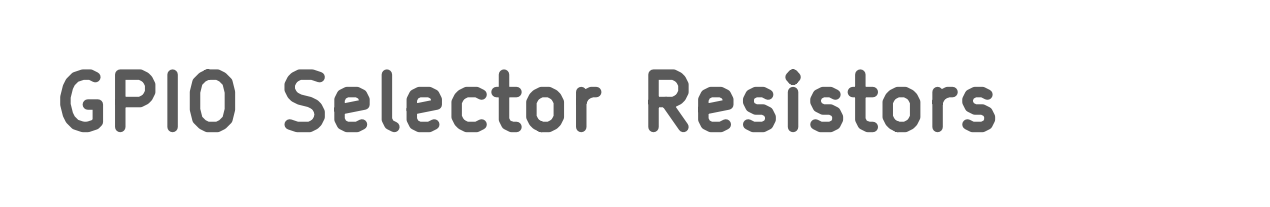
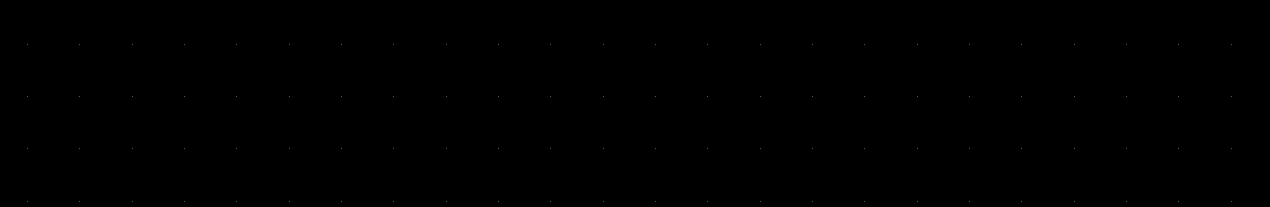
text: GPIO Selector Resistors (527, 100) -> none

